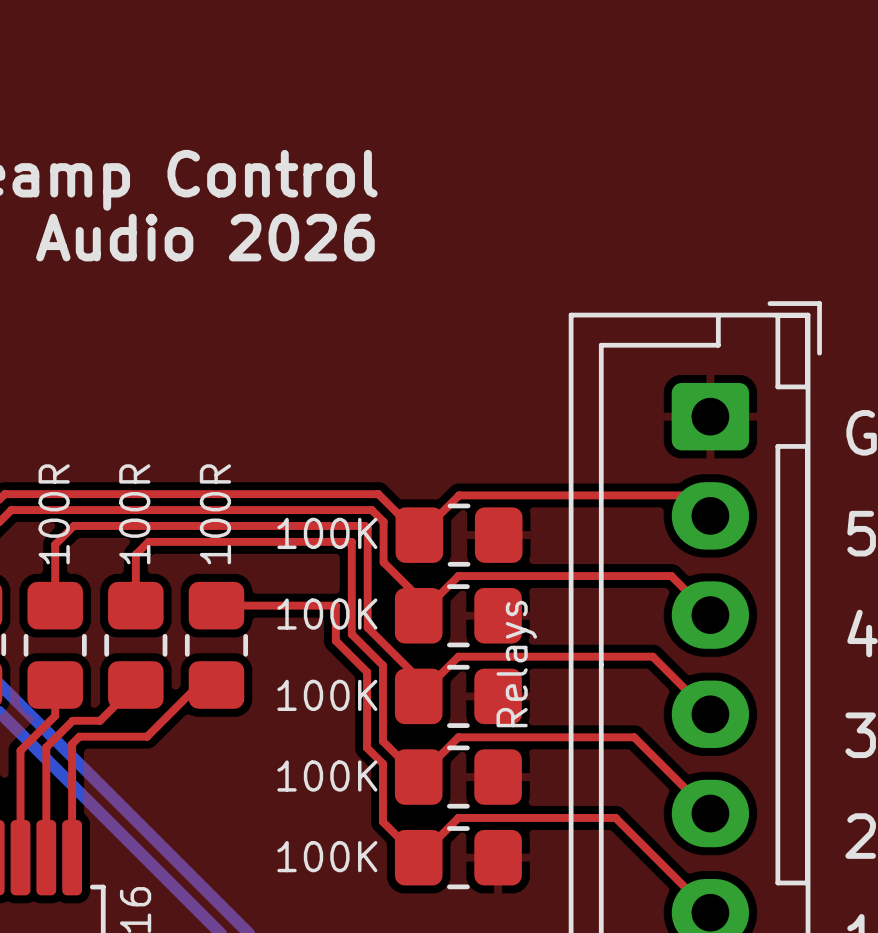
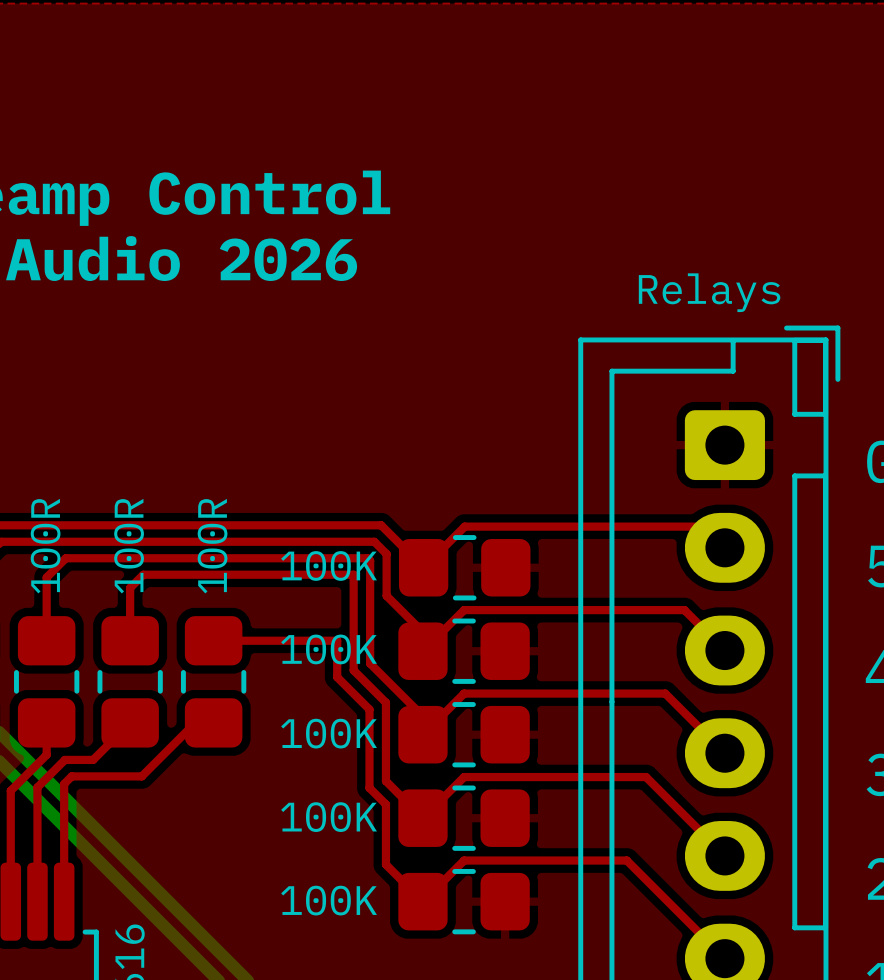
part value rotation: 0° (516, 664) -> 90° clockwise (709, 292)
part value position: Relays (516, 664) -> Relays (709, 292)

